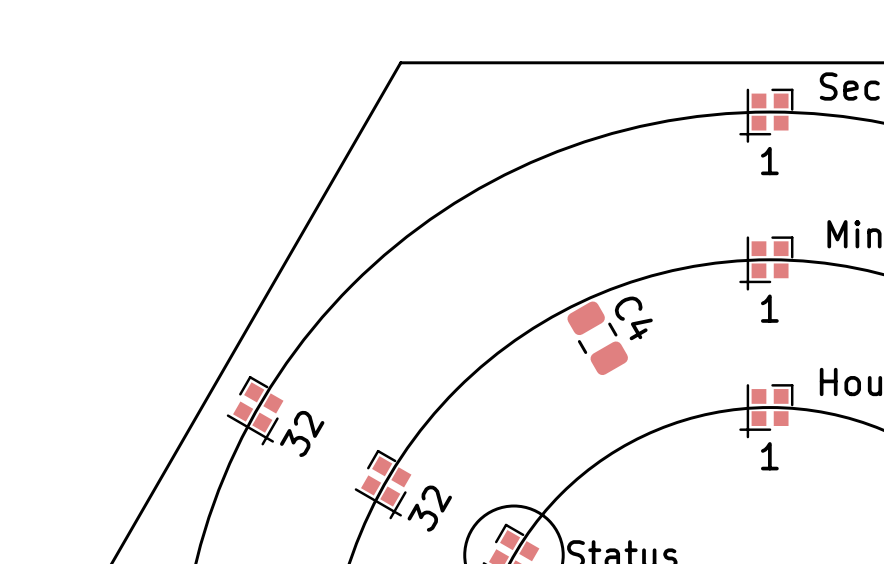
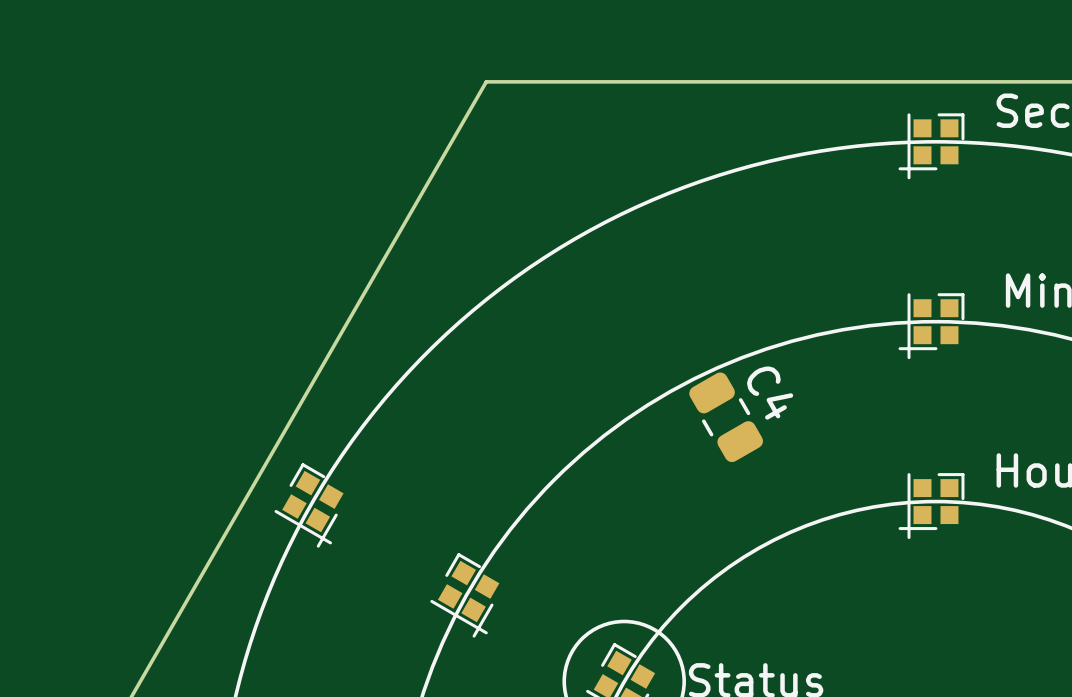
text: 1 (769, 161) -> none
text: 1 (769, 308) -> none
text: 32 (302, 433) -> none
text: 1 (769, 456) -> none
text: 32 (429, 508) -> none

